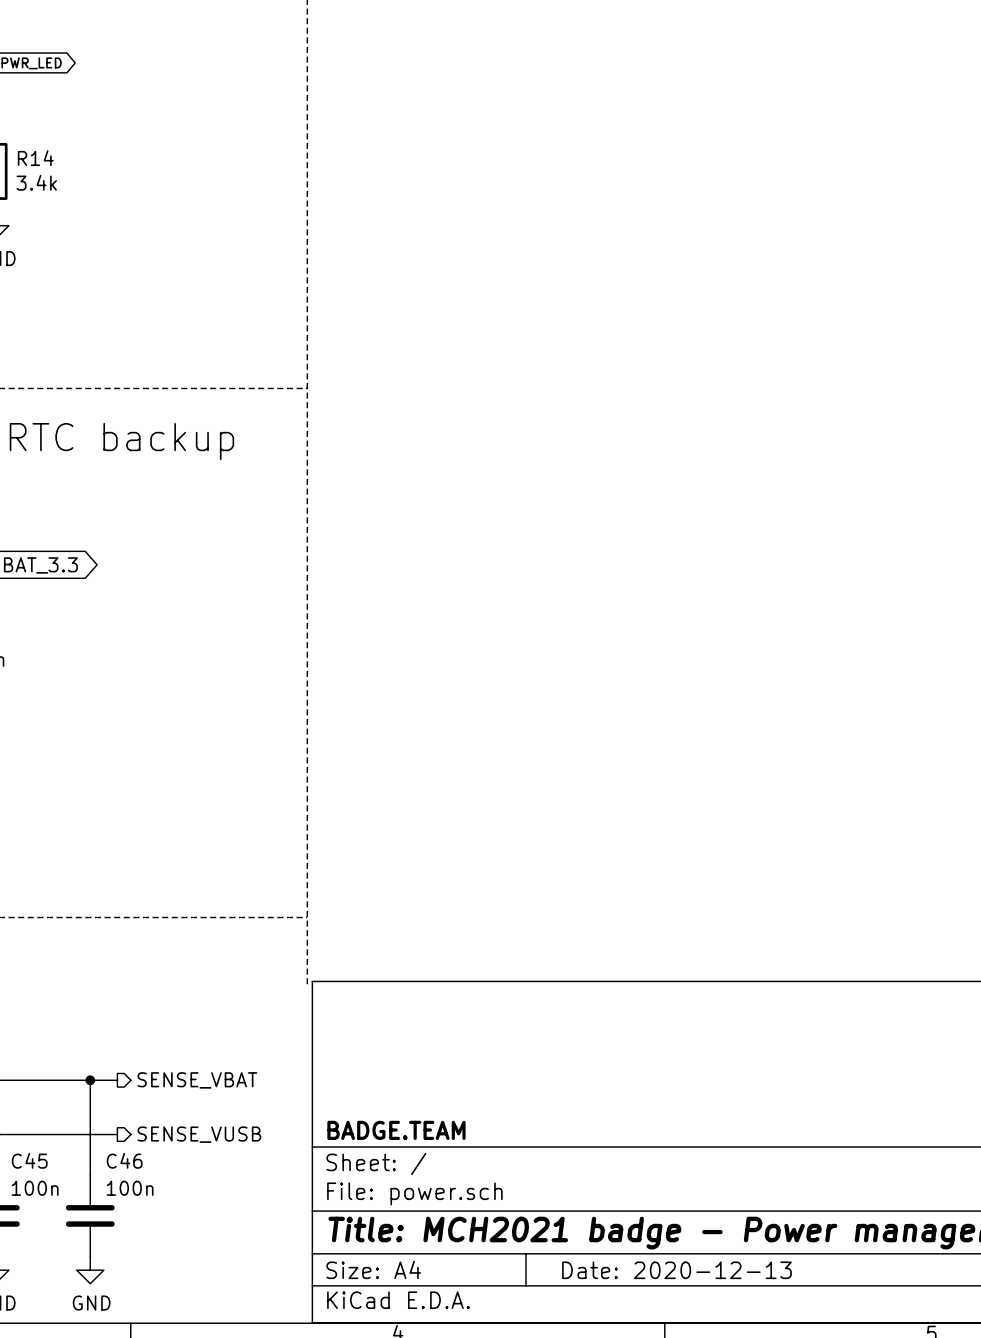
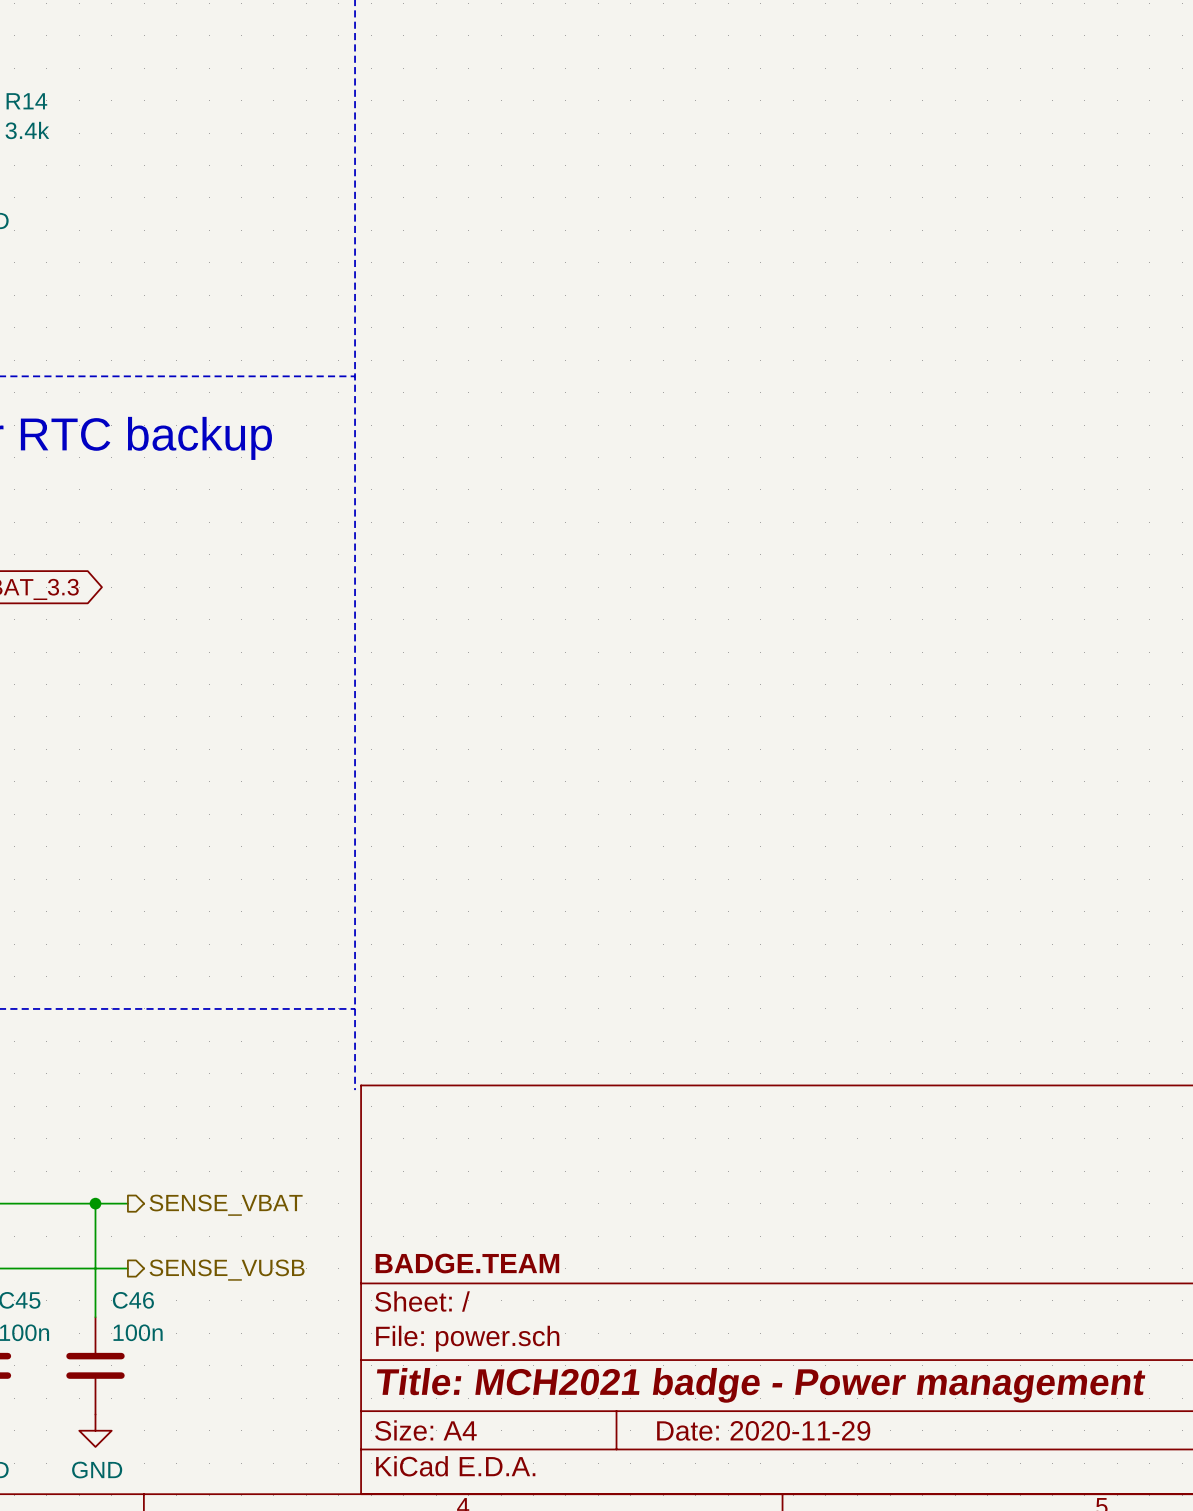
title block: Date: 2020-12-13 (676, 1270) -> Date: 2020-11-29 (763, 1430)

